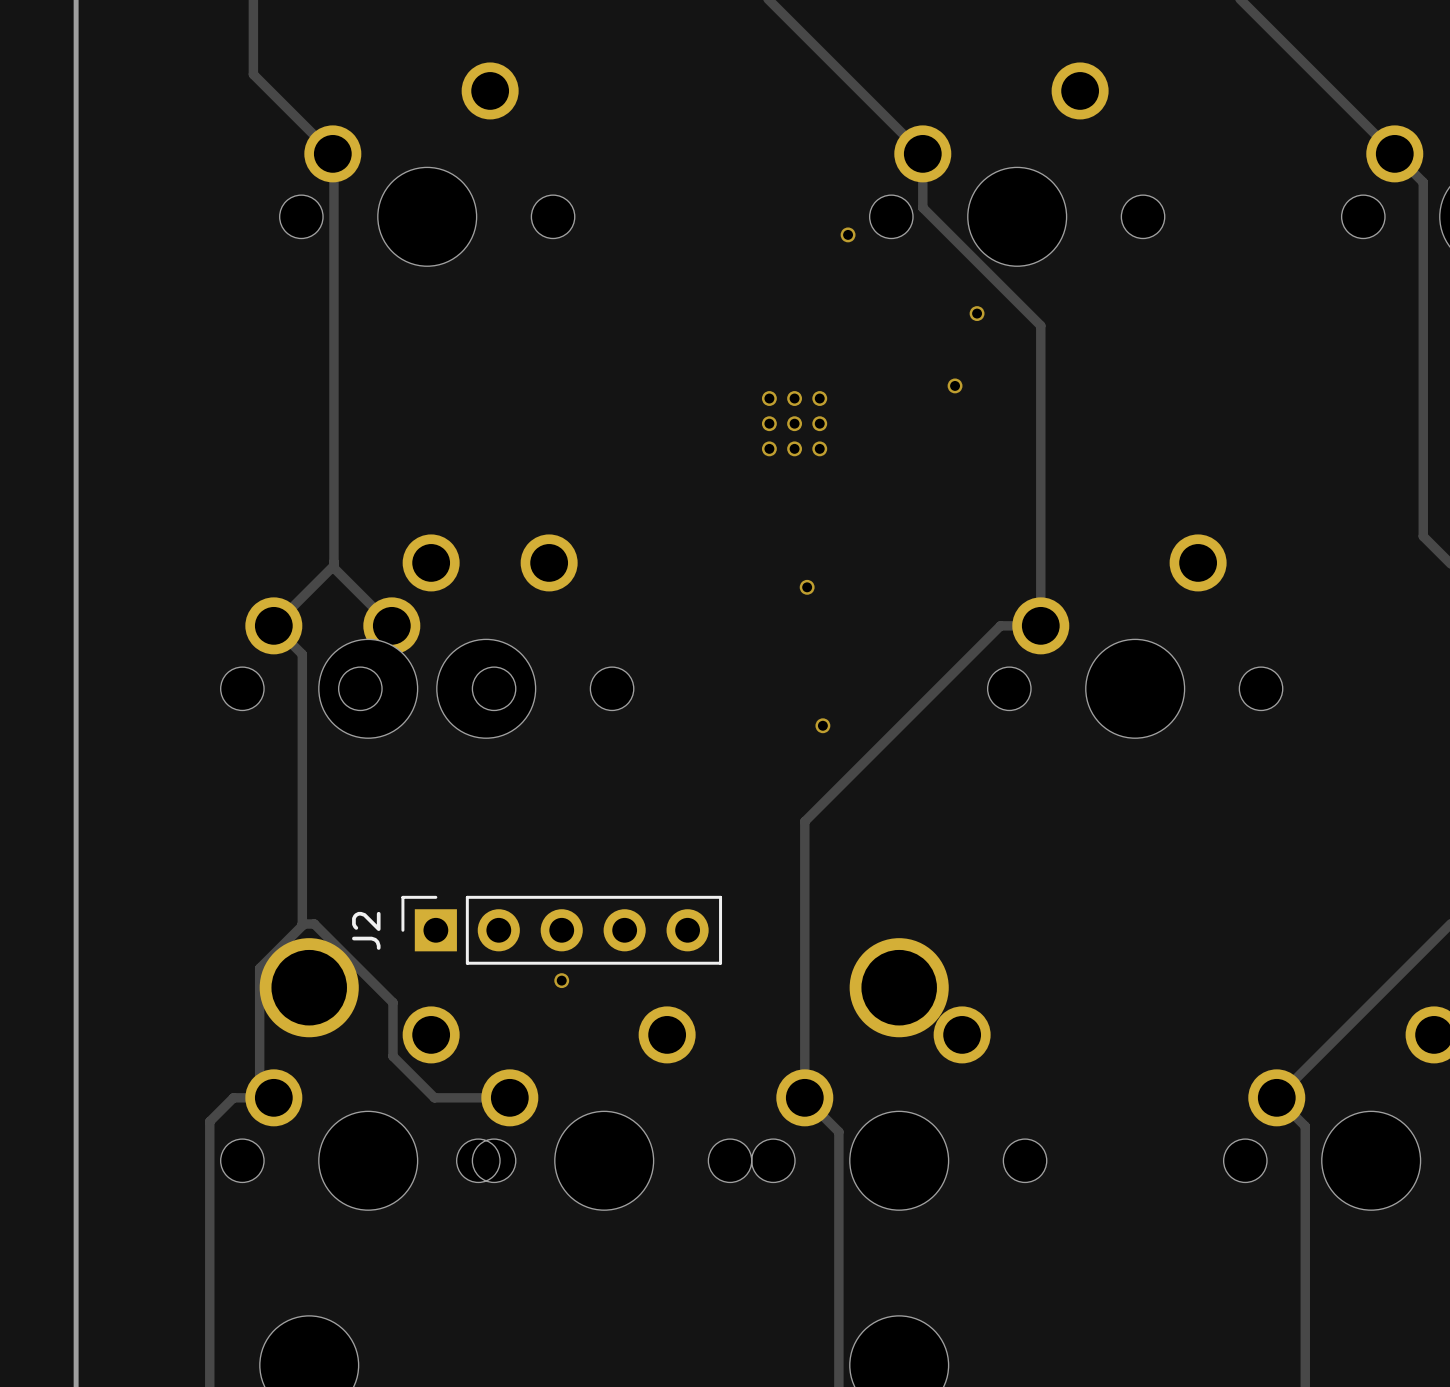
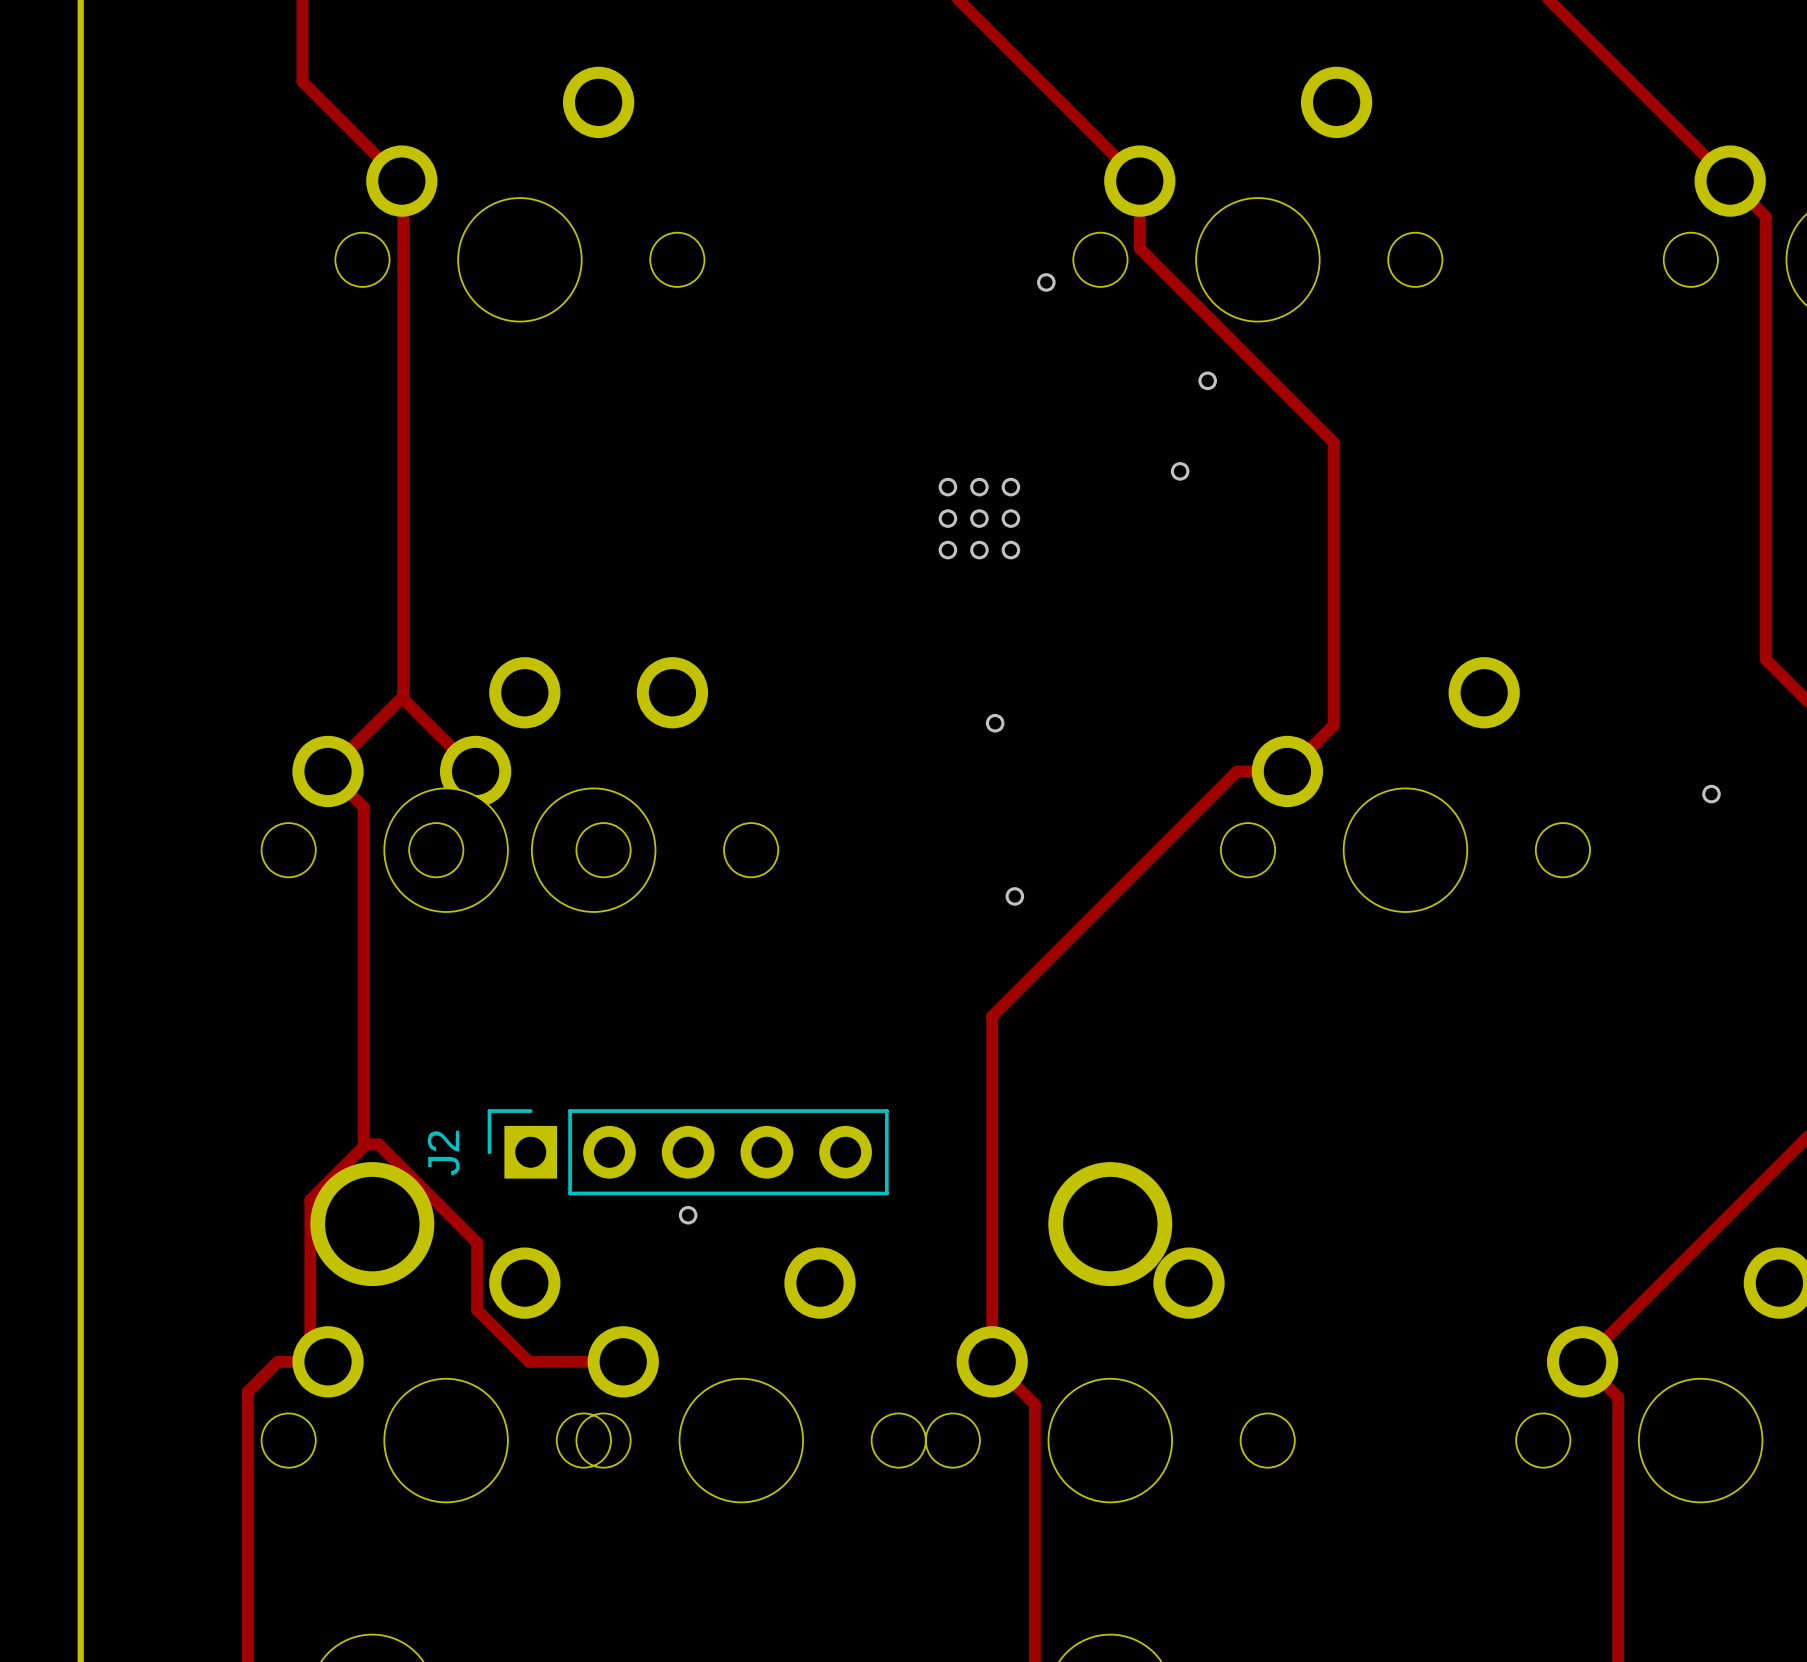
track: (1040, 325) (1040, 625) -> (1287, 396) (1333, 442) (1333, 725) (1287, 771)
via: none -> (1711, 794)

